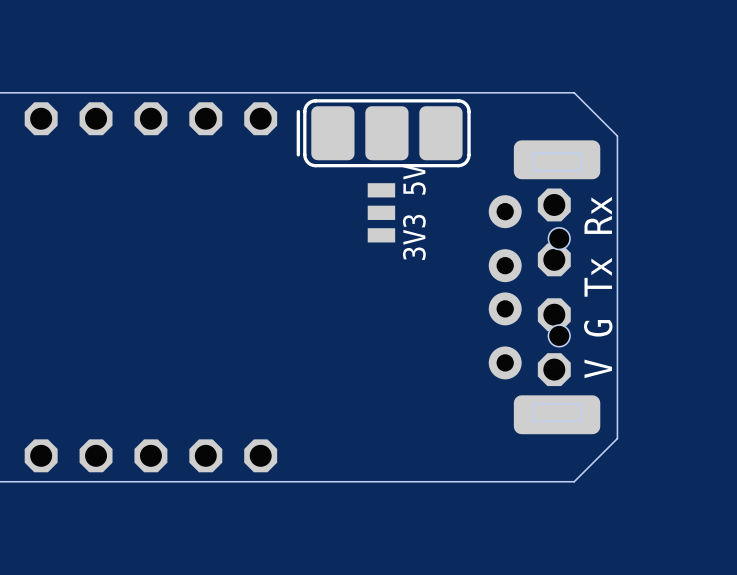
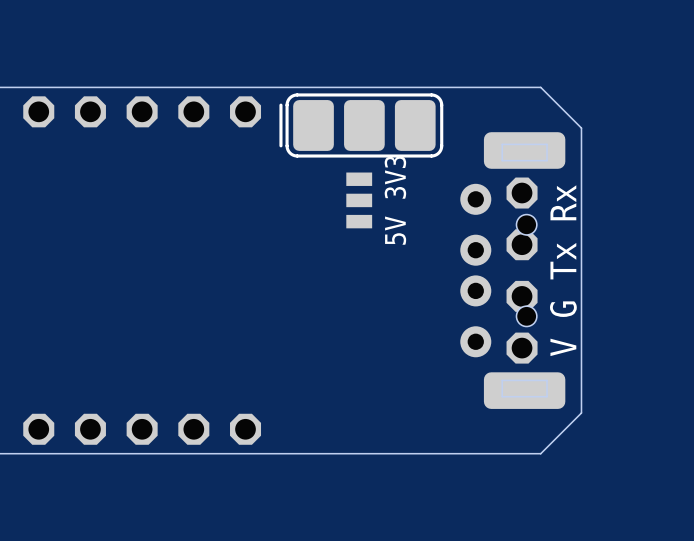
part value: 3V3 5V (414, 212) -> 5V 3V3 (395, 200)

